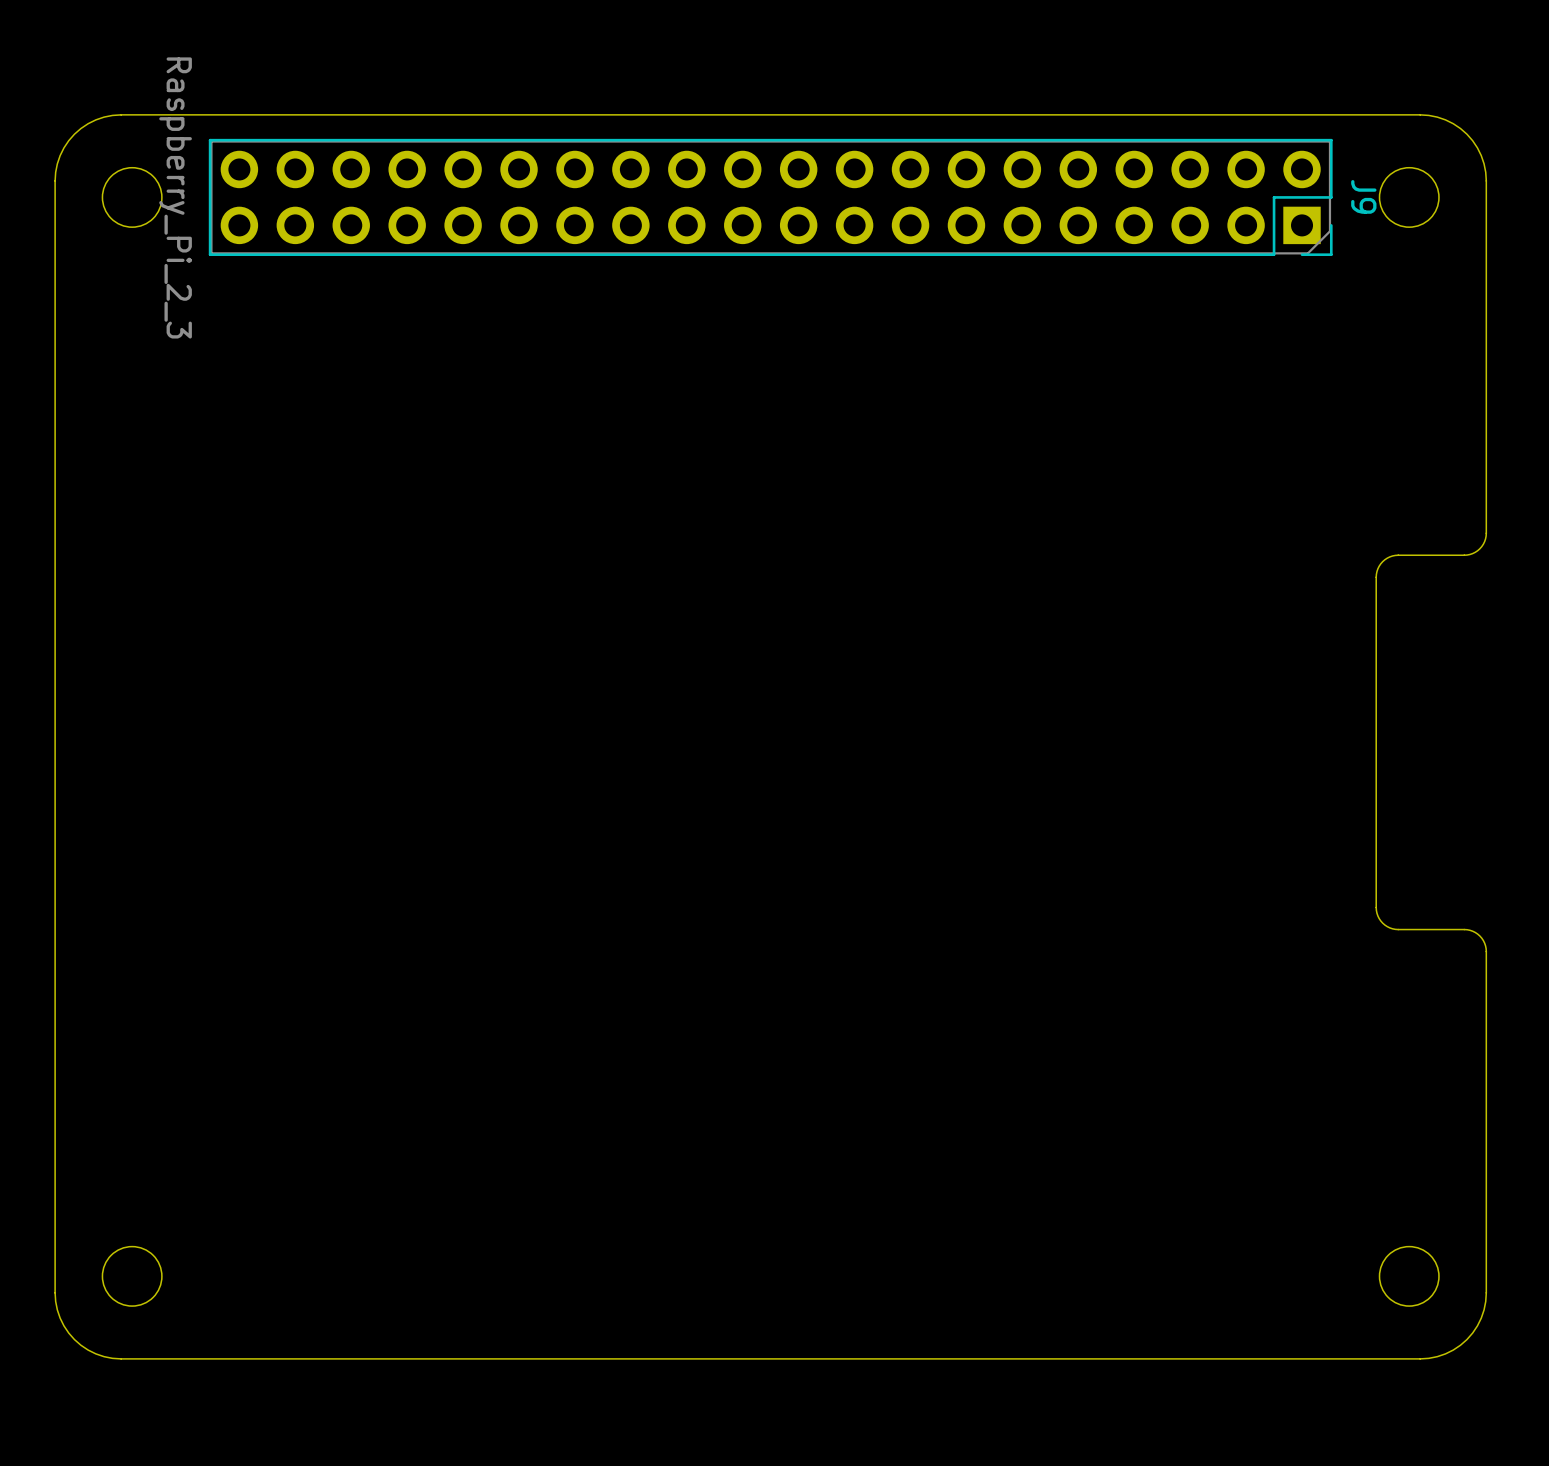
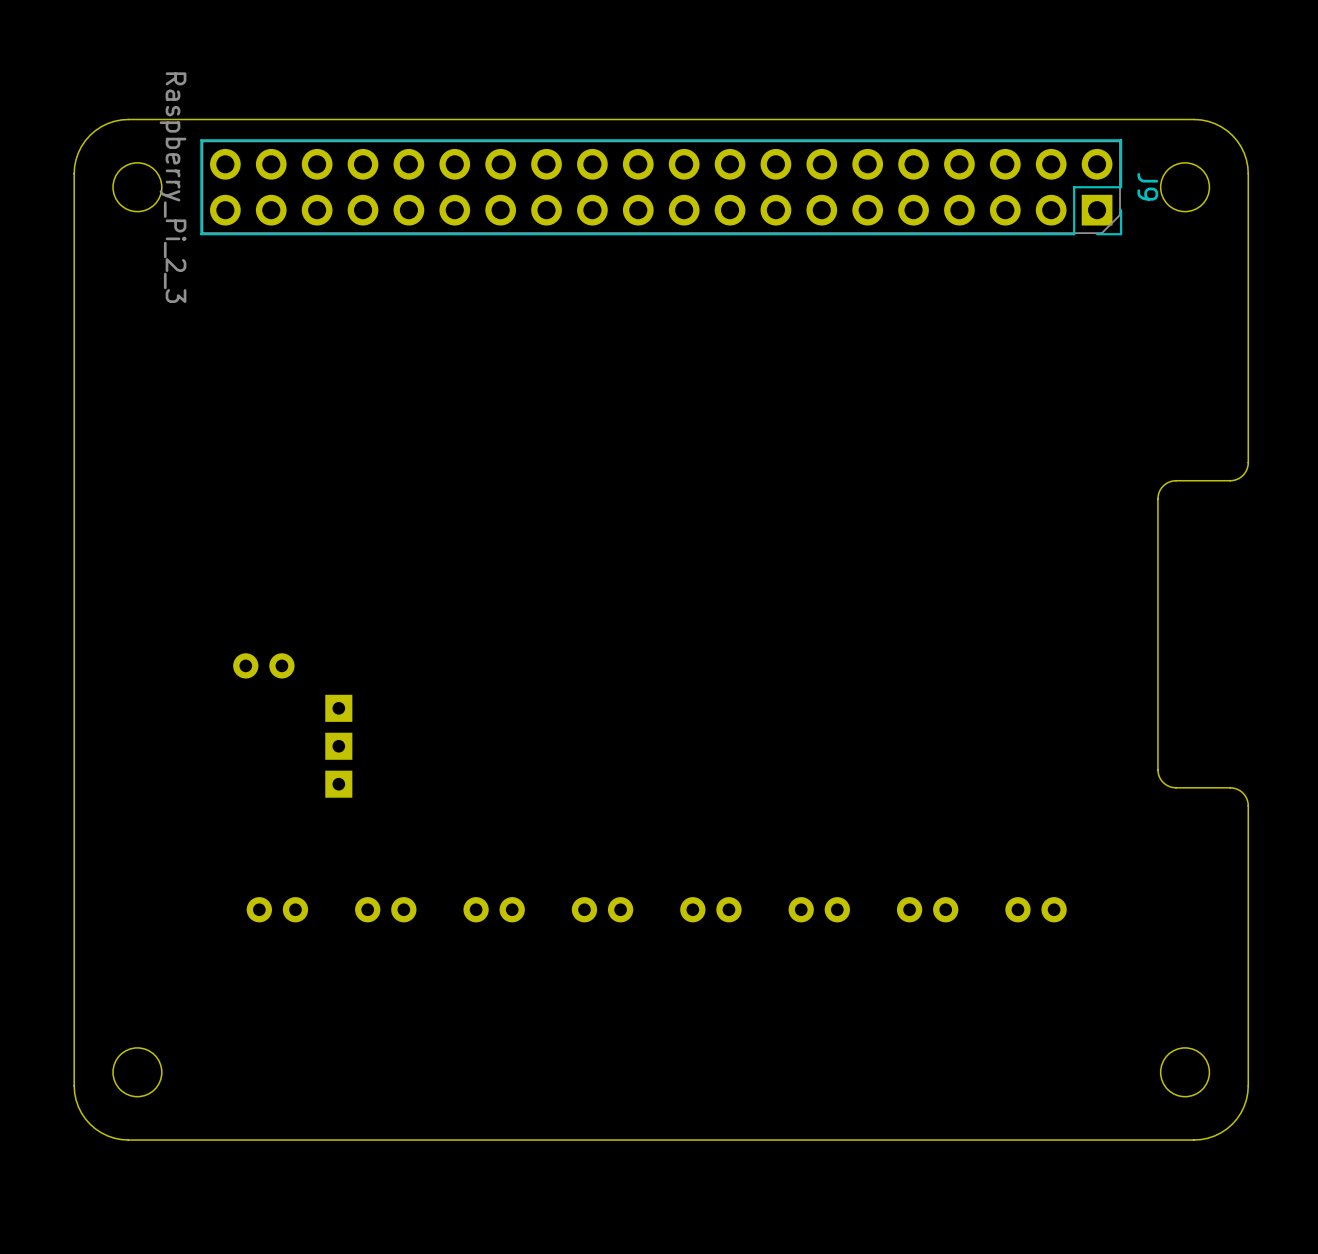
part: none -> (263, 665)
part: none -> (338, 708)
part: none -> (338, 746)
part: none -> (338, 784)
part: none -> (277, 909)
part: none -> (385, 909)
part: none -> (494, 909)
part: none -> (602, 909)
part: none -> (710, 909)
part: none -> (819, 909)
part: none -> (927, 909)
part: none -> (1036, 909)

